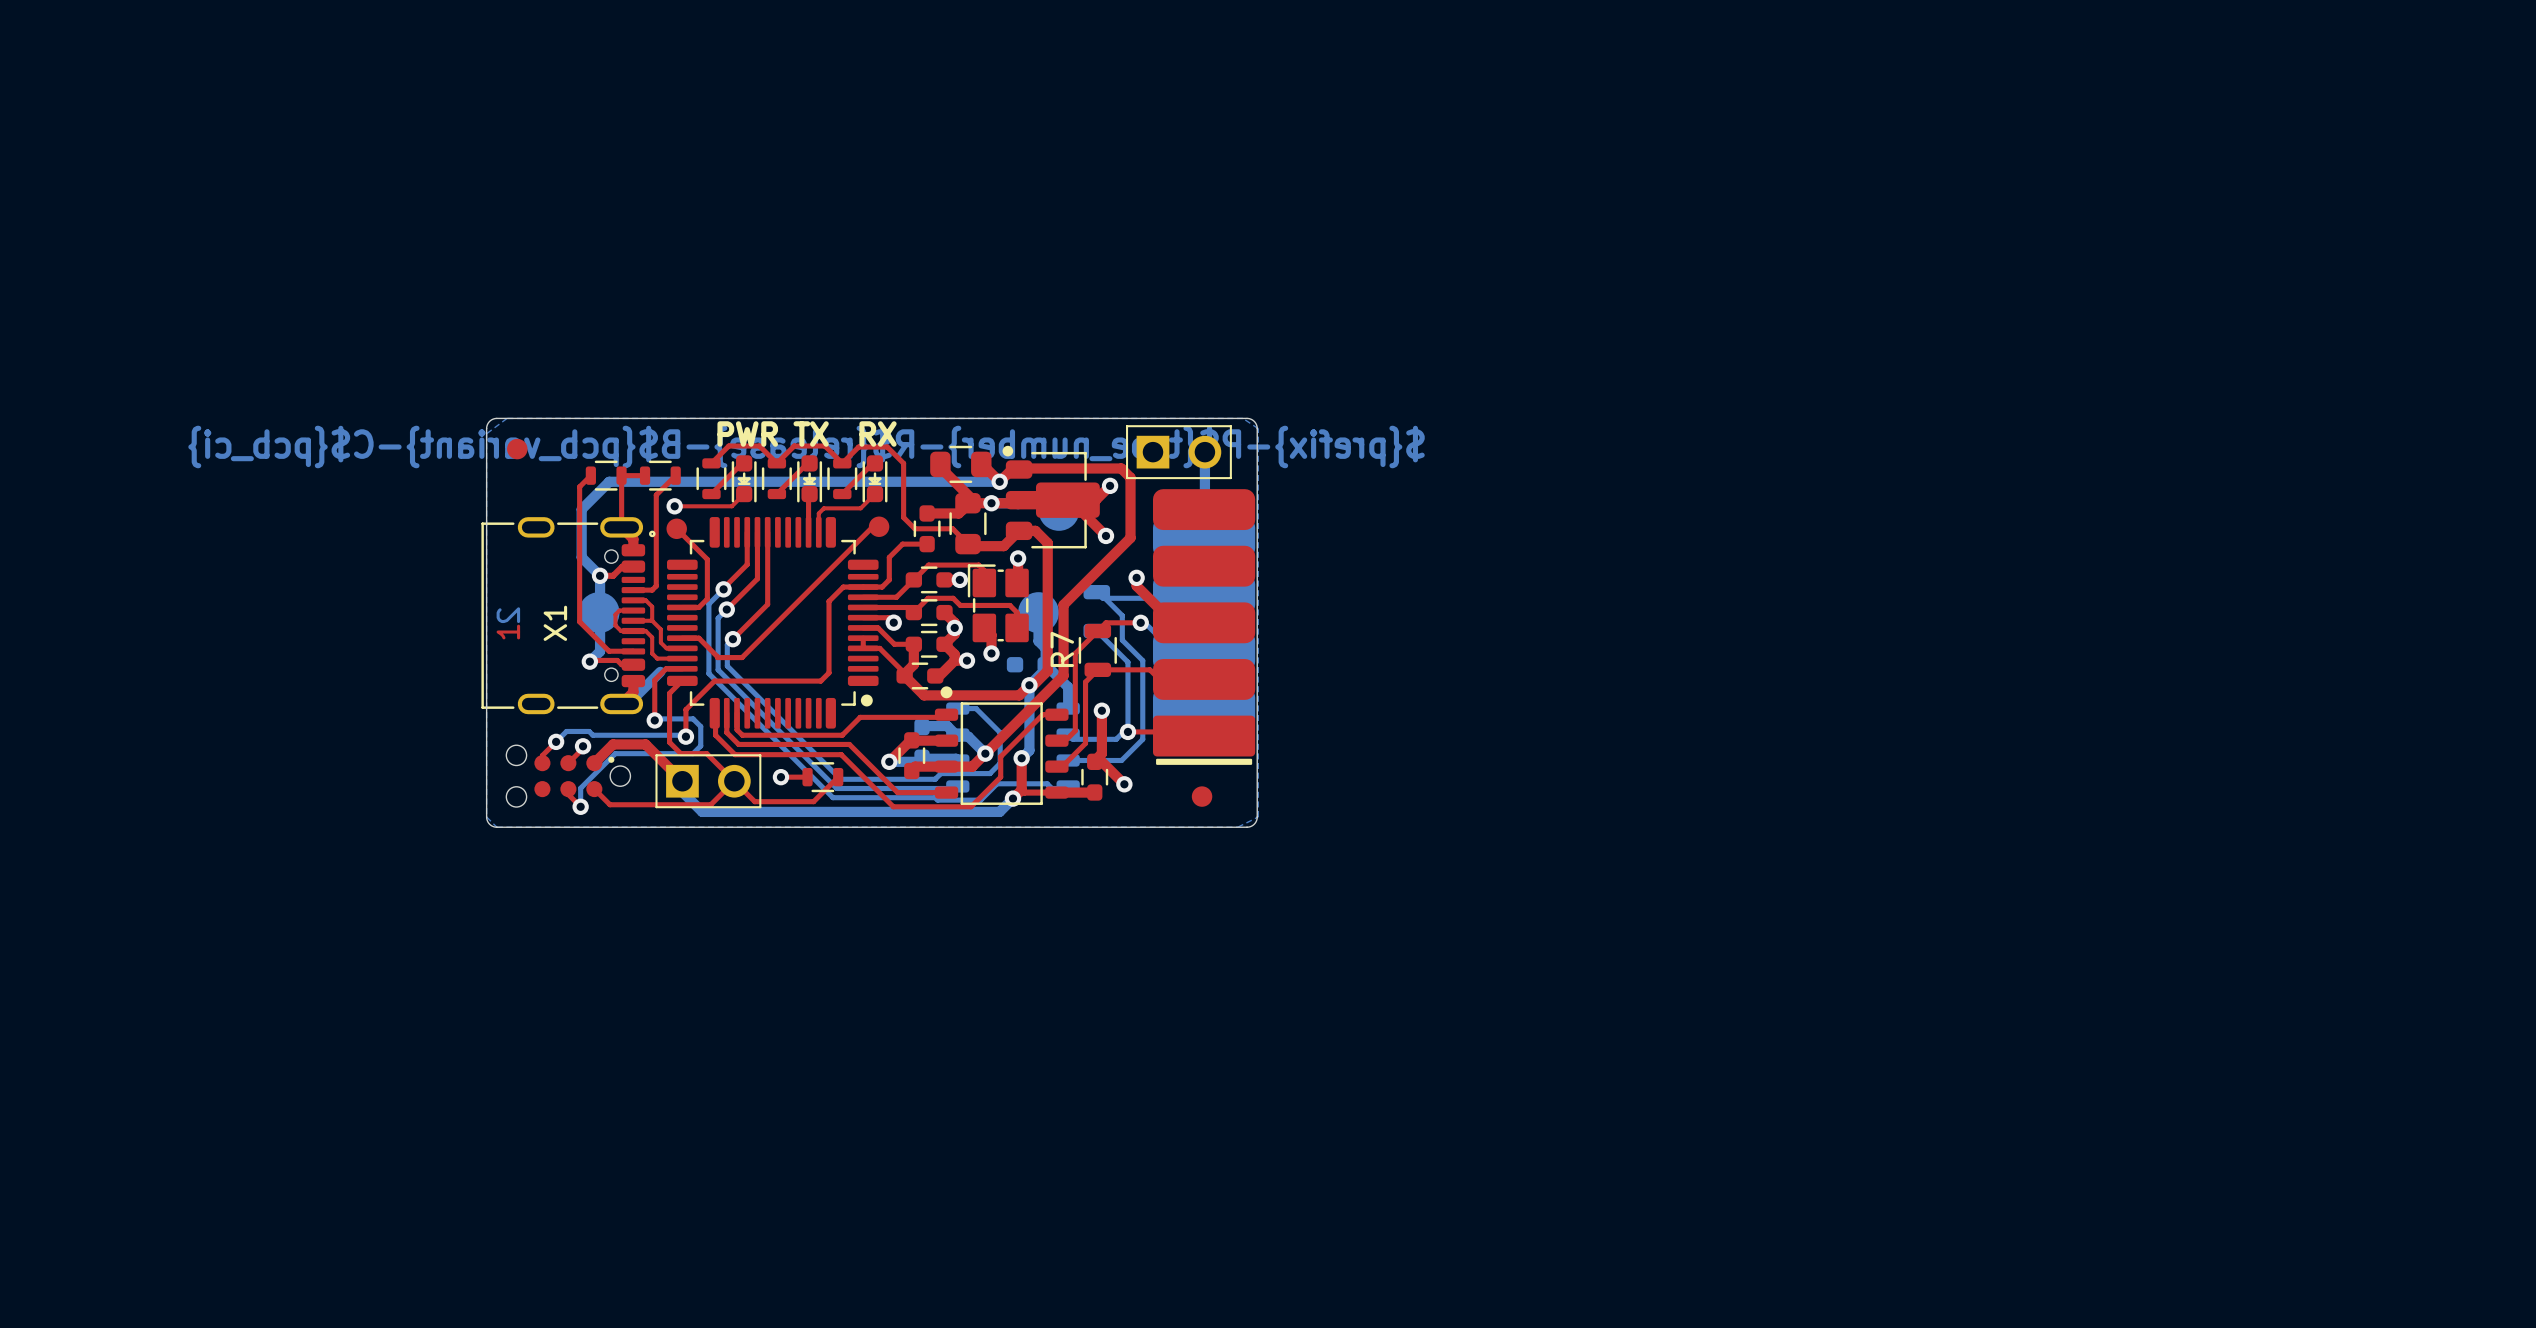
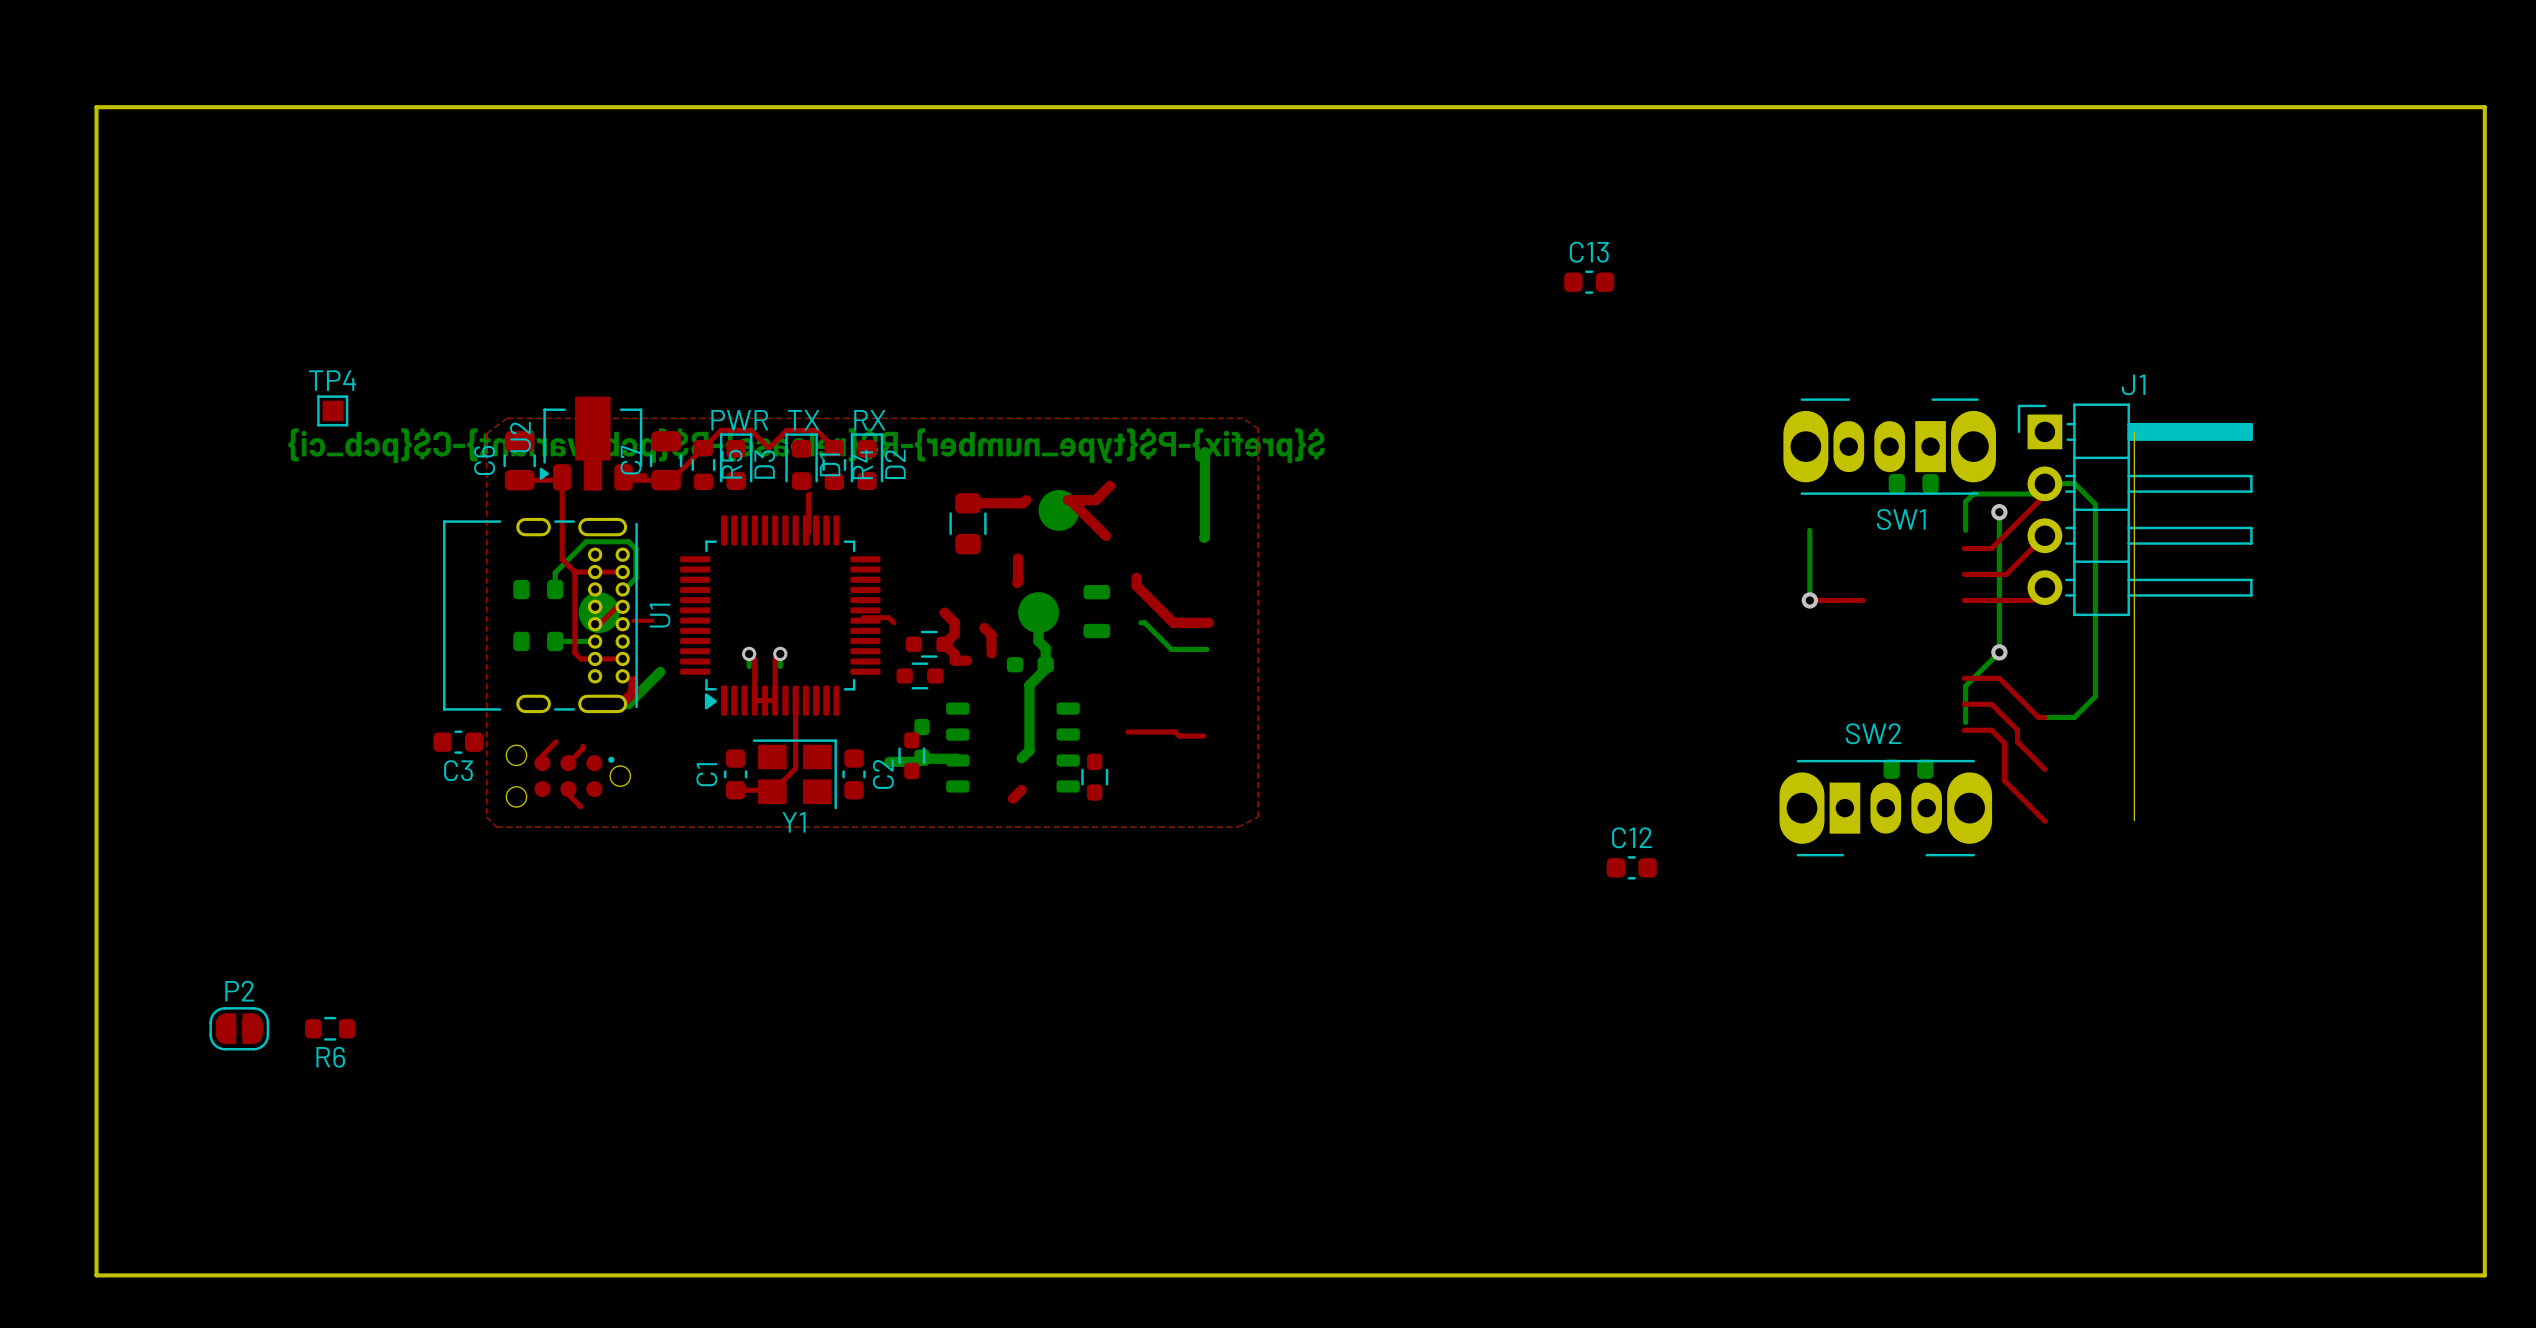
board edge: none -> (96, 107) (2484, 107) (2484, 1275) (96, 1275) (96, 107)
C13: none -> (1589, 282)
TP4: none -> (332, 410)
board edge: (496, 418) (1252, 419) (1257, 428) (1255, 822) (1247, 827) (491, 825) (486, 817) (486, 428) (489, 421) (496, 418) -> none
top zone outline: none -> (507, 418) (1242, 418) (1258, 428) (1258, 817) (1237, 827) (496, 827) (486, 817) (486, 433) (507, 418)
board edge: none -> (2134, 432) (2134, 820)
text position: PWR (747, 434) -> PWR (739, 420)
text position: TX (811, 434) -> TX (803, 420)
text position: RX (878, 434) -> RX (869, 420)
U2: none -> (590, 443)
SW1: none -> (1889, 446)
top track: none -> (768, 448) (751, 430) (721, 430) (671, 480) (626, 480) (623, 477)
top track: none -> (769, 448) (786, 430) (816, 430) (834, 448)
part: (517, 449) -> none
part: (1178, 452) -> none
C6: none -> (519, 460)
C7: none -> (666, 460)
D3: none -> (736, 461)
D1: none -> (801, 461)
D2: none -> (866, 461)
top track: (711, 463) (728, 446) (759, 446) (776, 463) (794, 446) (824, 446) (842, 463) (858, 447) (887, 447) (903, 463) (903, 517) (914, 528) (952, 528) (966, 543) (966, 546) (1003, 546) (1019, 530) (1035, 530) (1047, 543) (1047, 670) (1033, 685) (1029, 685) (1019, 695) (924, 695) (903, 674) -> none
top track: (744, 463) (711, 494) -> none
top track: (809, 463) (776, 494) -> none
top track: (875, 463) (842, 494) -> none
R5: none -> (703, 464)
R4: none -> (834, 464)
part: (960, 464) -> none
top track: (940, 467) (972, 499) (958, 513) (927, 513) -> none
top track: (981, 468) (986, 468) (999, 481) (1014, 467) (1019, 469) (1121, 468) (1130, 477) (1130, 537) (1063, 604) (1063, 675) (985, 753) -> none
top track: (590, 475) (579, 486) (579, 621) (609, 651) (633, 651) -> none
part: (606, 475) -> none
top track: (621, 475) (621, 527) (633, 539) (633, 550) -> none
part: (660, 475) -> none
top track: (675, 475) (656, 495) (656, 586) (652, 590) (633, 590) -> none
part: (711, 478) -> none
part: (744, 478) -> none
part: (776, 478) -> none
part: (809, 478) -> none
part: (842, 478) -> none
part: (875, 478) -> none
top track: none -> (519, 480) (559, 480) (562, 477) (562, 559) (574, 572)
bottom track: (999, 481) (609, 481) (581, 509) (581, 557) (600, 575) (600, 651) (589, 661) -> none
via: (999, 481) -> none
part: none -> (1913, 483)
top track: none -> (2044, 483) (2044, 495) (1991, 548) (1964, 548)
via: (1110, 485) -> none
top track: (744, 494) (731, 506) (674, 506) -> none
top track: (875, 494) (860, 508) (823, 508) (818, 513) (818, 532) -> none
part: (1051, 497) -> none
via: (991, 503) -> none
via: (674, 506) -> none
J1: none -> (2135, 509)
bottom track: none -> (1999, 512) (1999, 652) (1965, 686) (1965, 722)
via: none -> (1999, 512)
top track: (879, 526) (872, 526) (742, 657) (717, 657) (698, 638) (682, 638) -> none
part: (879, 526) -> none
top track: (676, 528) (707, 559) (707, 598) (698, 607) (682, 607) -> none
part: (676, 528) -> none
part: (927, 528) -> none
bottom track: none -> (1809, 530) (1809, 600)
bottom track: none -> (1965, 530) (1965, 501) (1973, 494) (2034, 494) (2045, 483) (2074, 483) (2095, 504) (2095, 696) (2074, 717) (2044, 717)
top track: (747, 532) (747, 564) (723, 589) -> none
top track: (757, 532) (757, 578) (726, 609) -> none
top track: (767, 532) (767, 604) (732, 639) -> none
via: (1105, 535) -> none
top track: none -> (2044, 535) (2006, 574) (1964, 574)
top track: (927, 544) (902, 544) (889, 557) (889, 579) (882, 587) (843, 587) (829, 601) (829, 672) (820, 681) (714, 681) (685, 709) (685, 736) -> none
via: (1018, 558) -> none
top track: (633, 566) (622, 566) (613, 575) (600, 575) -> none
top track: none -> (574, 572) (574, 653) (580, 658) (622, 658)
top track: none -> (574, 572) (622, 572)
via: (600, 575) -> none
via: (1136, 577) -> none
part: (929, 579) -> none
via: (959, 579) -> none
top track: (984, 582) (984, 570) (978, 565) (928, 565) (896, 597) (863, 597) -> none
top track: none -> (2044, 587) (2032, 600) (1964, 600)
part: none -> (538, 589)
bottom track: none -> (555, 589) (555, 572) (586, 541) (628, 541) (635, 549) (635, 578) (622, 589)
bottom track: (723, 589) (708, 604) (708, 673) (832, 797) (935, 797) (937, 800) (980, 800) (997, 783) (1047, 783) (1051, 788) (1068, 788) -> none
via: (723, 589) -> none
bottom track: (1204, 594) (1200, 598) (1102, 598) (1096, 592) (1098, 592) (1122, 615) (1122, 640) (1142, 660) (1142, 739) (1121, 760) (1068, 760) -> none
top track: (633, 600) (645, 600) (652, 606) (652, 620) (660, 629) (660, 642) (666, 648) (682, 648) -> none
top track: none -> (1809, 600) (1863, 600)
via: none -> (1809, 600)
part: (998, 603) -> none
top track: none -> (622, 606) (617, 606) (599, 624) (595, 624)
drawing: [496, 607, 521, 640] -> none
top track: (863, 607) (908, 607) (913, 612) (928, 598) (953, 598) (960, 605) (1009, 605) (1017, 612) (1017, 627) -> none
bottom track: (726, 609) (718, 618) (718, 669) (836, 788) (957, 788) -> none
via: (726, 609) -> none
top track: (633, 610) (619, 610) (615, 614) (615, 625) (621, 631) (645, 631) (652, 637) (652, 653) (657, 658) (682, 658) -> none
part: (929, 612) -> none
part: none -> (540, 615)
X1: (568, 615) -> none
U1: none -> (780, 615)
part: (772, 622) -> none
via: (893, 622) -> none
top track: (1140, 622) (1105, 622) (1075, 653) (1075, 730) (1065, 740) (1056, 740) -> none
via: (1140, 622) -> none
top track: (863, 627) (878, 627) (894, 644) (913, 644) (913, 664) (903, 674) -> none
via: (954, 627) -> none
part: (1204, 627) -> none
bottom track: (1096, 631) (1127, 662) (1127, 731) (1123, 731) (1116, 739) (1072, 739) (1068, 734) -> none
top track: (863, 638) (863, 648) (879, 648) (903, 672) (903, 674) -> none
bottom track: (732, 639) (727, 644) (727, 666) (840, 779) (935, 779) (940, 773) (989, 773) (1000, 763) (1000, 732) (976, 708) (957, 708) -> none
via: (732, 639) -> none
part: none -> (538, 641)
bottom track: none -> (555, 641) (595, 641)
R7: (1097, 650) -> none
via: none -> (1999, 652)
top track: none -> (749, 653) (754, 659) (754, 700) (775, 700) (775, 659) (780, 653)
bottom track: none -> (749, 653) (749, 666)
via: none -> (749, 653)
bottom track: none -> (780, 653) (780, 666)
via: none -> (780, 653)
via: (991, 653) -> none
top track: (954, 660) (940, 674) -> none
via: (966, 660) -> none
top track: (589, 661) (617, 660) (621, 664) (633, 664) -> none
via: (589, 661) -> none
bottom track: (1045, 664) (1068, 687) (1068, 708) -> none
top track: (682, 668) (666, 668) (654, 680) (654, 720) -> none
top track: none -> (1964, 678) (1999, 678) (2038, 717) (2044, 717)
top track: (1208, 679) (1159, 679) (1149, 669) (1097, 669) (1085, 682) (1085, 743) (1062, 766) (1056, 766) -> none
top track: (682, 680) (669, 693) (669, 742) (680, 753) (706, 753) (754, 801) (813, 801) (838, 777) -> none
via: (1029, 685) -> none
top track: none -> (795, 700) (795, 768) (772, 791) (735, 790)
top track: none -> (1964, 704) (1991, 704) (2017, 730) (2017, 741) (2044, 769)
top track: (1101, 710) (1101, 753) (1094, 760) (1100, 760) (1124, 784) -> none
via: (1101, 710) -> none
top track: (714, 713) (715, 735) (734, 754) (841, 754) (893, 806) (971, 806) (1000, 777) (1000, 756) (1042, 714) (1056, 714) -> none
top track: (726, 713) (726, 732) (738, 744) (849, 744) (897, 792) (946, 792) -> none
top track: (737, 713) (737, 729) (742, 735) (842, 735) (860, 717) (943, 717) (946, 714) -> none
bottom track: (654, 720) (693, 718) (700, 726) (700, 745) (693, 753) (615, 753) (580, 788) (580, 806) -> none
via: (654, 720) -> none
bottom track: (923, 726) (947, 726) (957, 736) (968, 736) (985, 753) -> none
top track: none -> (1964, 730) (1991, 730) (2004, 743) (2004, 780) (2044, 821)
via: (1127, 731) -> none
bottom track: (685, 736) (592, 735) (589, 731) (566, 731) (556, 741) -> none
via: (685, 736) -> none
top track: (946, 740) (911, 739) (889, 761) -> none
via: (556, 741) -> none
C3: none -> (458, 742)
part: (1001, 745) -> none
via: (583, 746) -> none
top track: (985, 753) (972, 766) (915, 766) (911, 769) -> none
via: (985, 753) -> none
top track: (1021, 758) (1021, 789) (1024, 792) (1094, 791) -> none
via: (1021, 758) -> none
via: (889, 761) -> none
top track: (594, 763) (613, 744) (645, 744) (682, 781) -> none
part: none -> (1908, 769)
C1: none -> (735, 774)
Y1: none -> (794, 774)
C2: none -> (854, 774)
top track: (780, 777) (807, 777) -> none
via: (780, 777) -> none
part: (822, 777) -> none
bottom track: (682, 781) (682, 792) (702, 811) (999, 811) (1012, 798) -> none
part: (708, 781) -> none
top track: (734, 781) (710, 804) (610, 804) (594, 789) -> none
via: (1124, 784) -> none
part: (1202, 796) -> none
via: (1012, 798) -> none
via: (580, 806) -> none
SW2: none -> (1885, 808)
C12: none -> (1631, 867)
P2: none -> (239, 1028)
R6: none -> (330, 1028)

